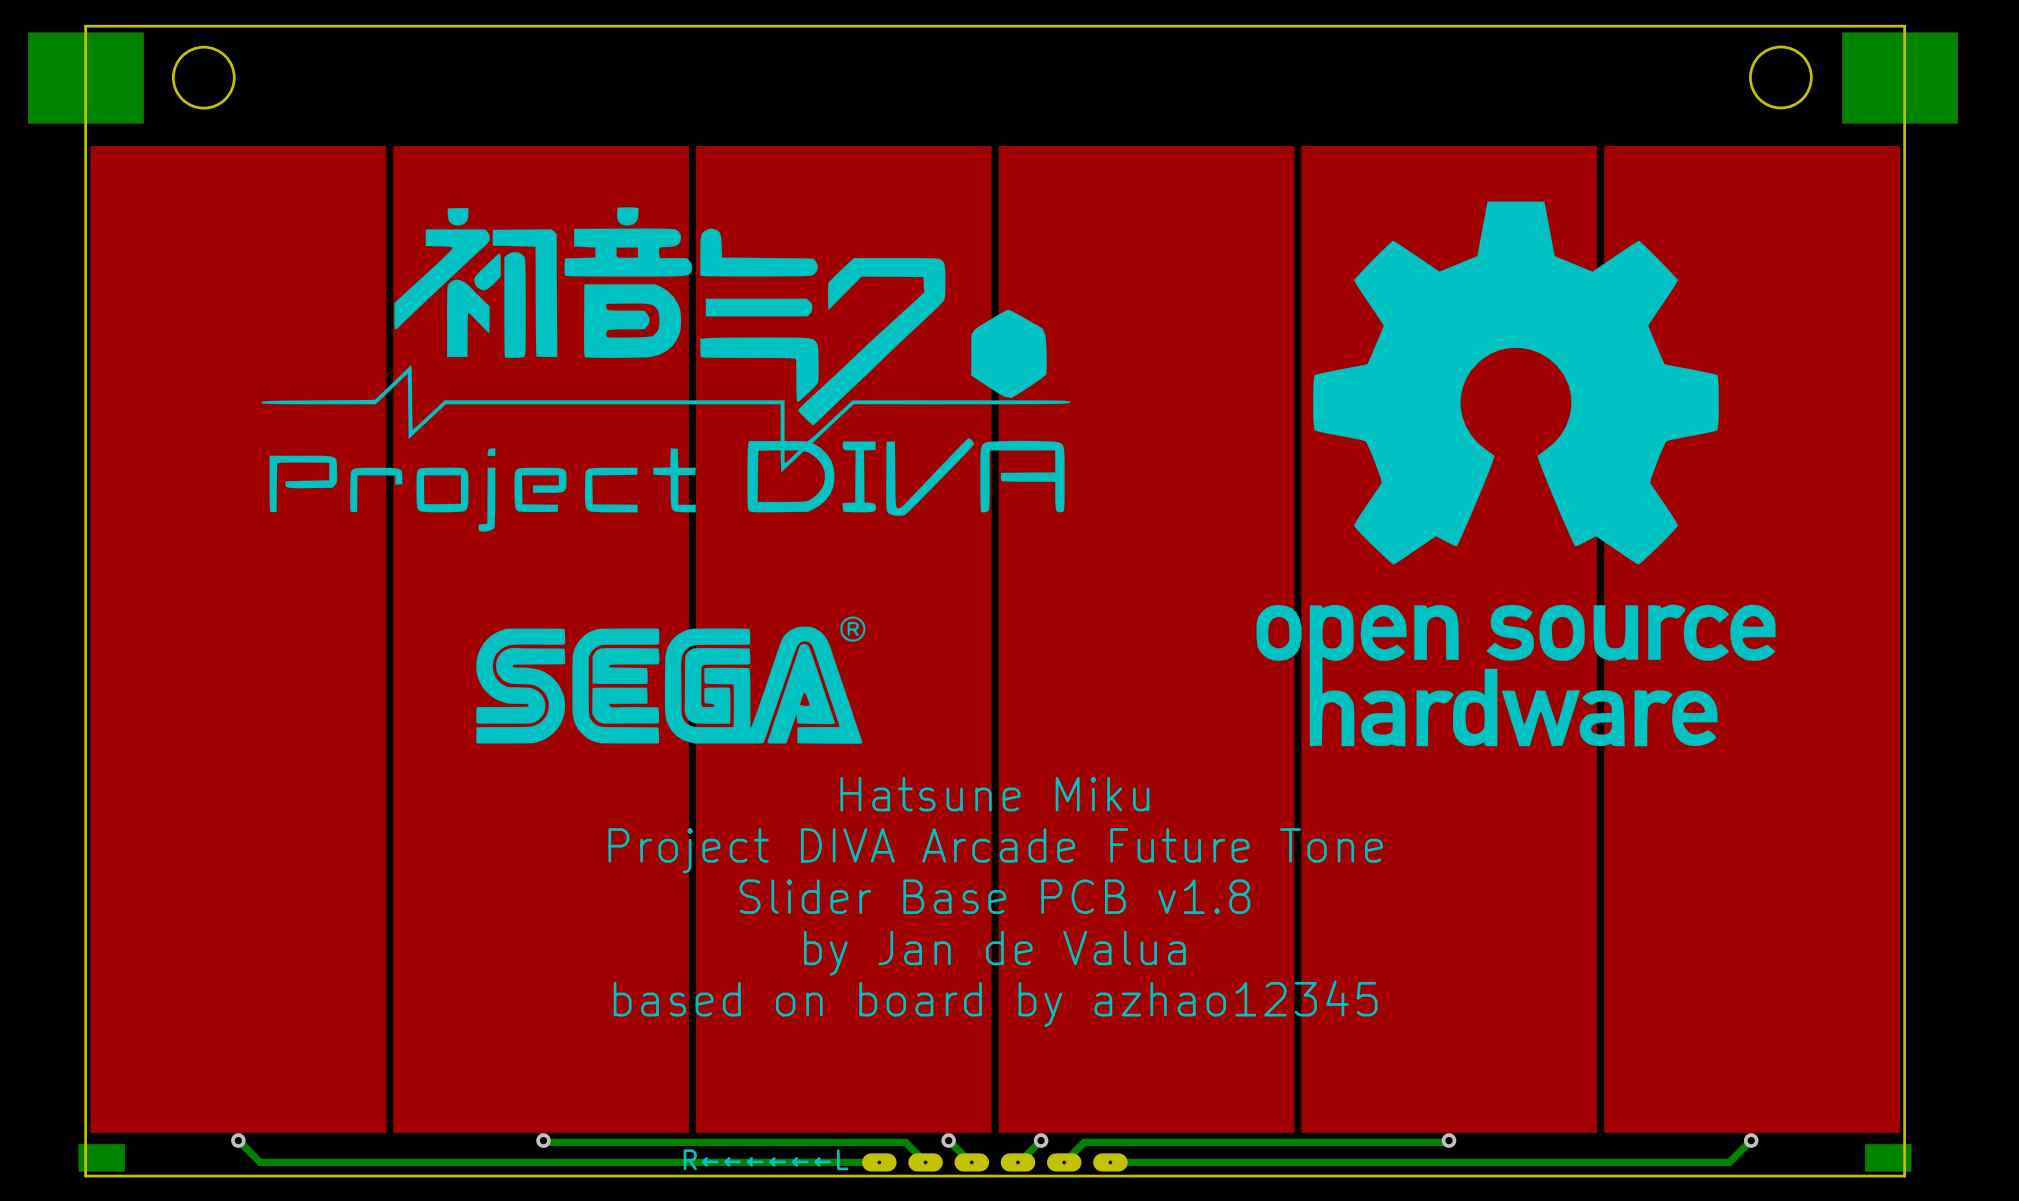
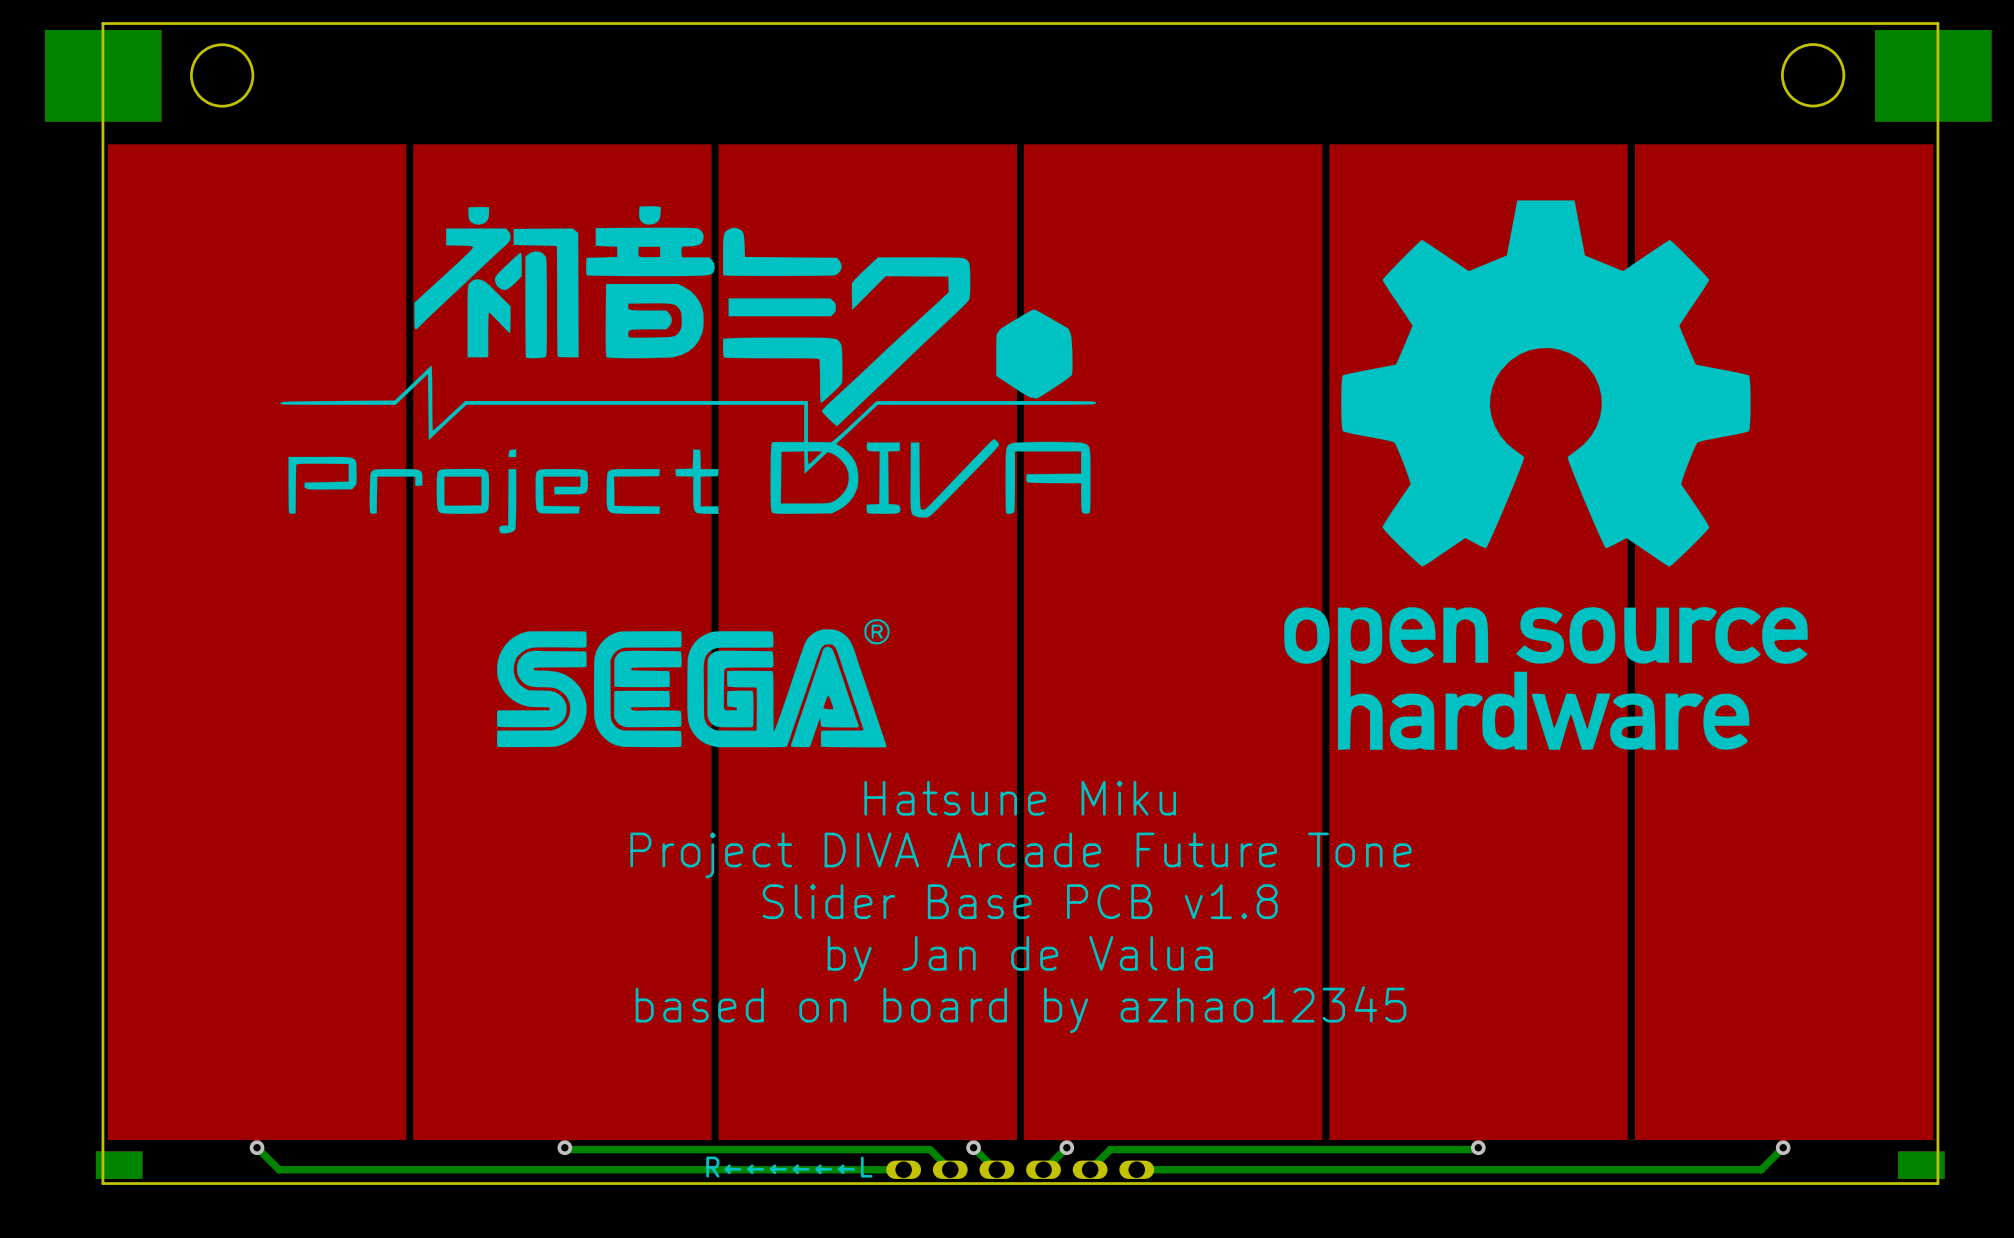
part footprint: [862, 1153, 1128, 1172] -> [886, 1160, 1155, 1179]

